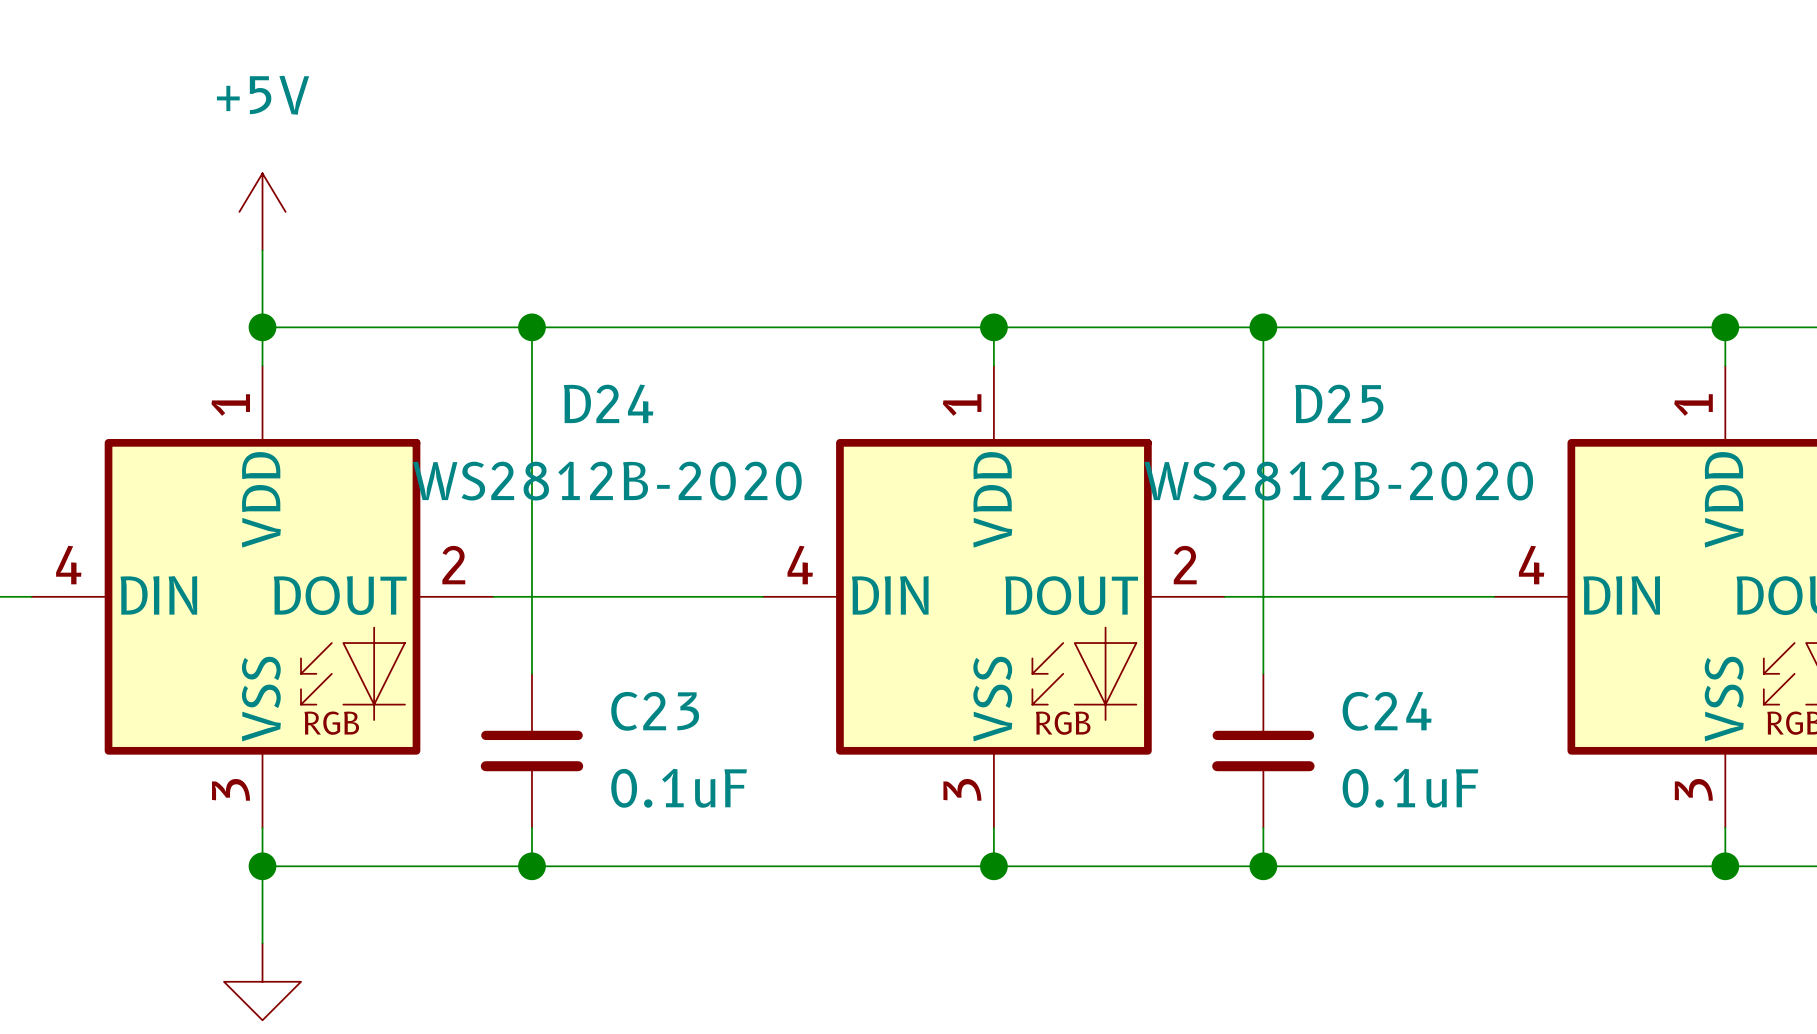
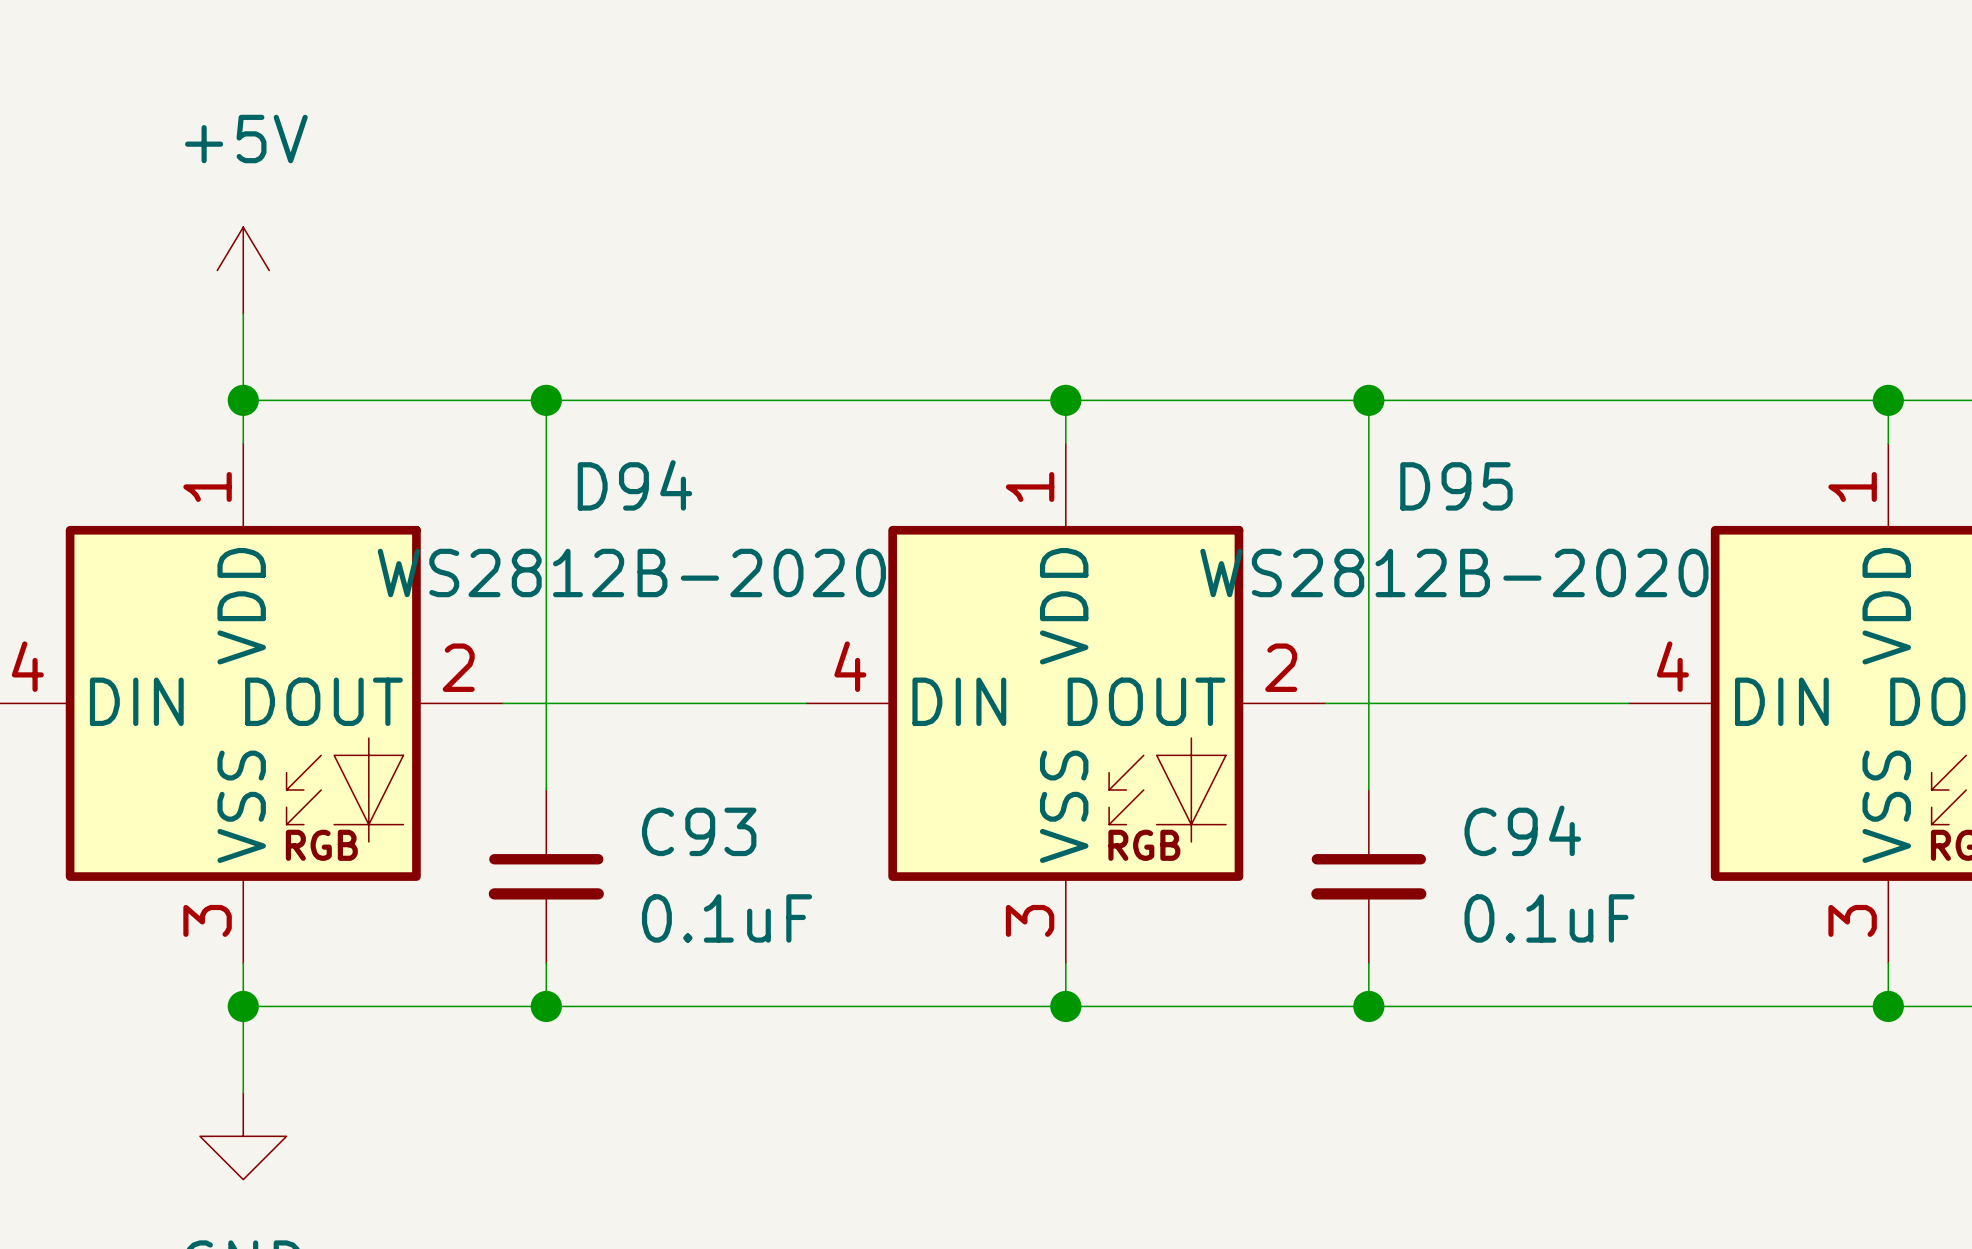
D24 name: D24 (608, 403) -> D94 (634, 485)
D25 name: D25 (1339, 403) -> D95 (1456, 486)
C23 name: C23 (655, 711) -> C93 (699, 831)
C24 name: C24 (1387, 711) -> C94 (1522, 830)

